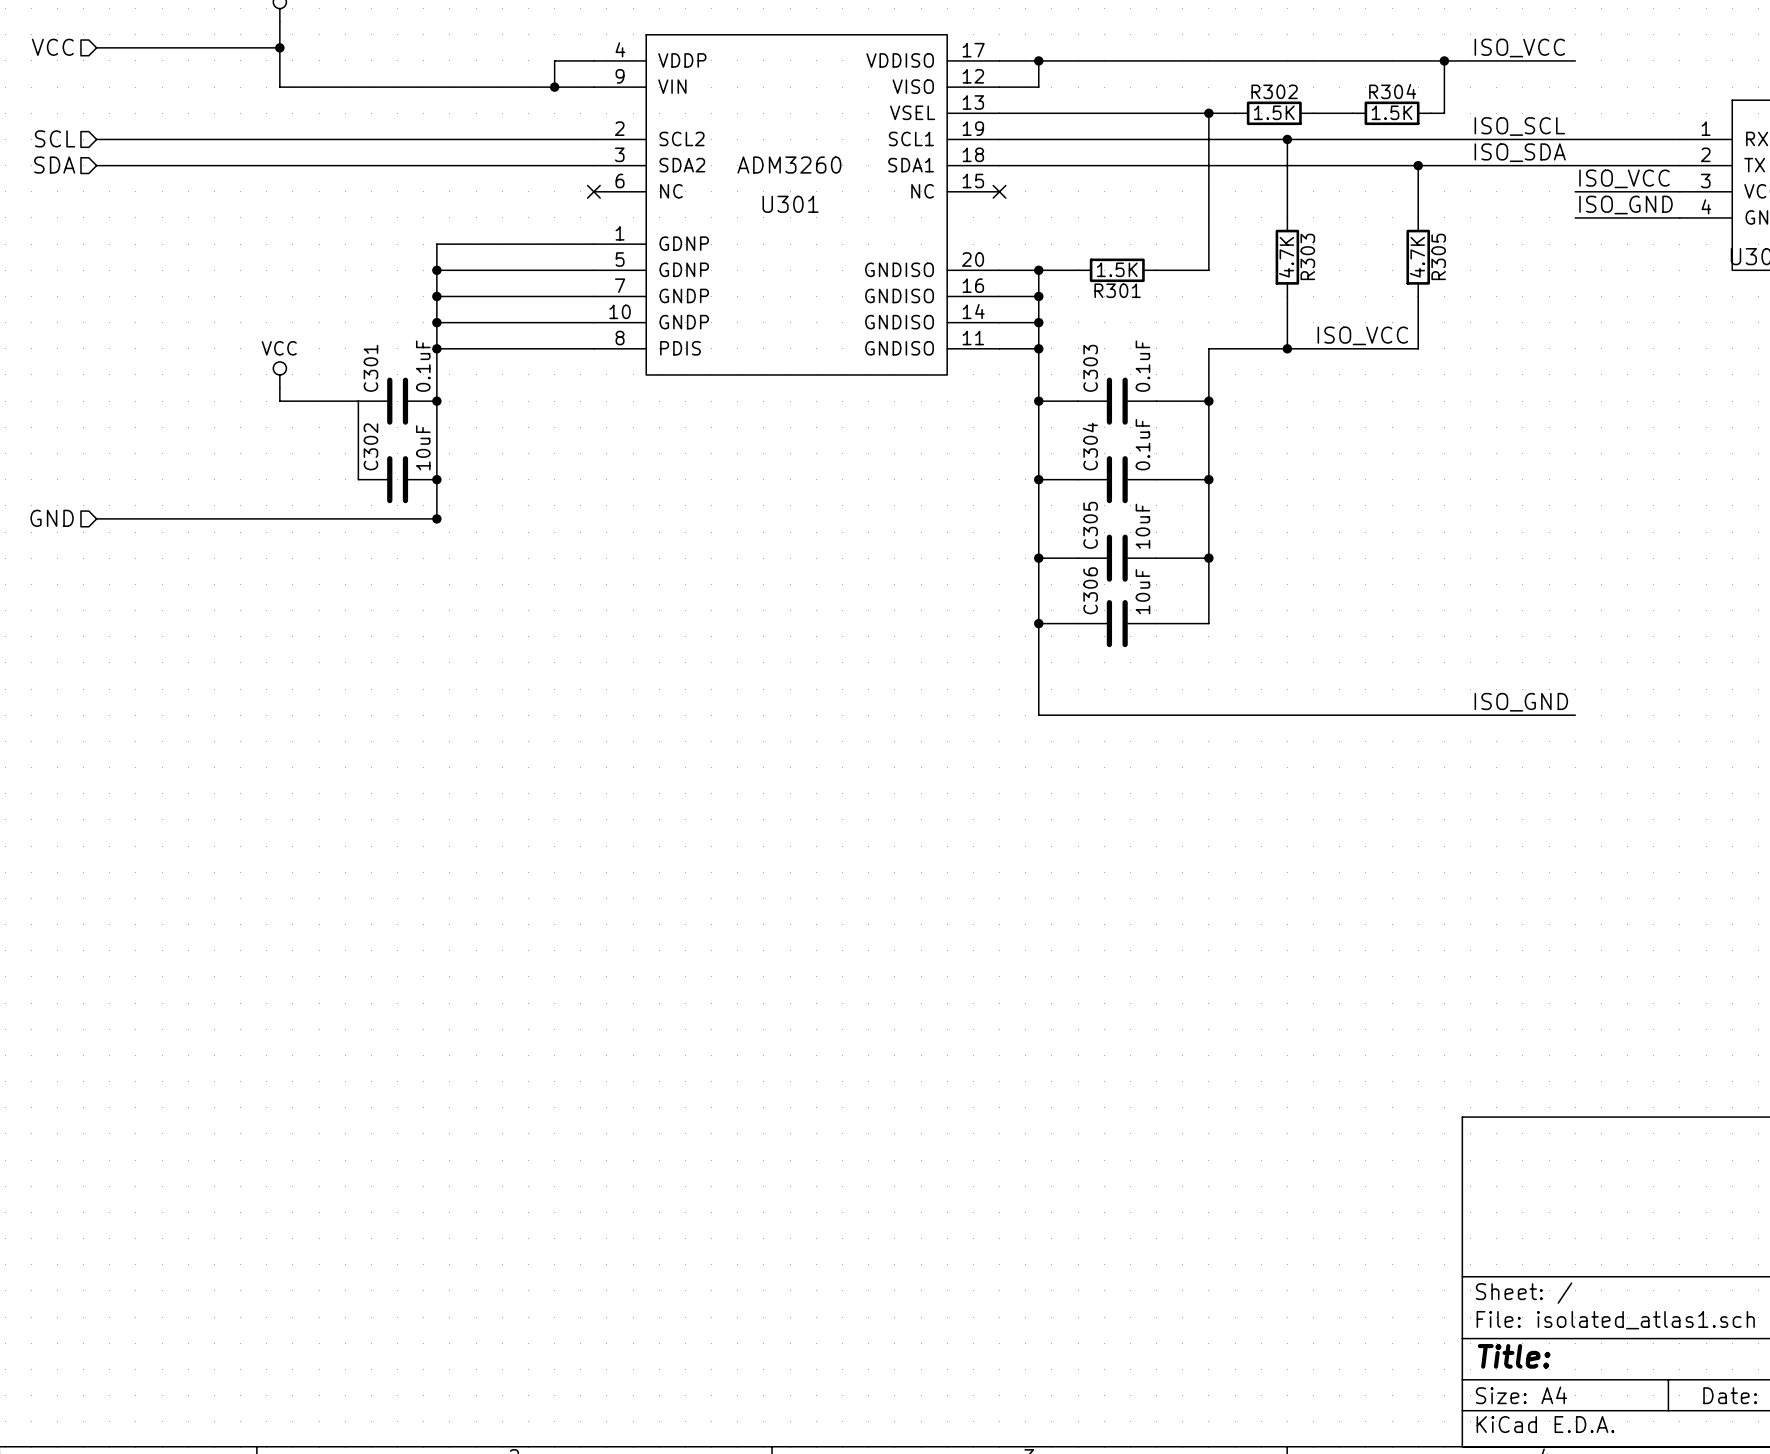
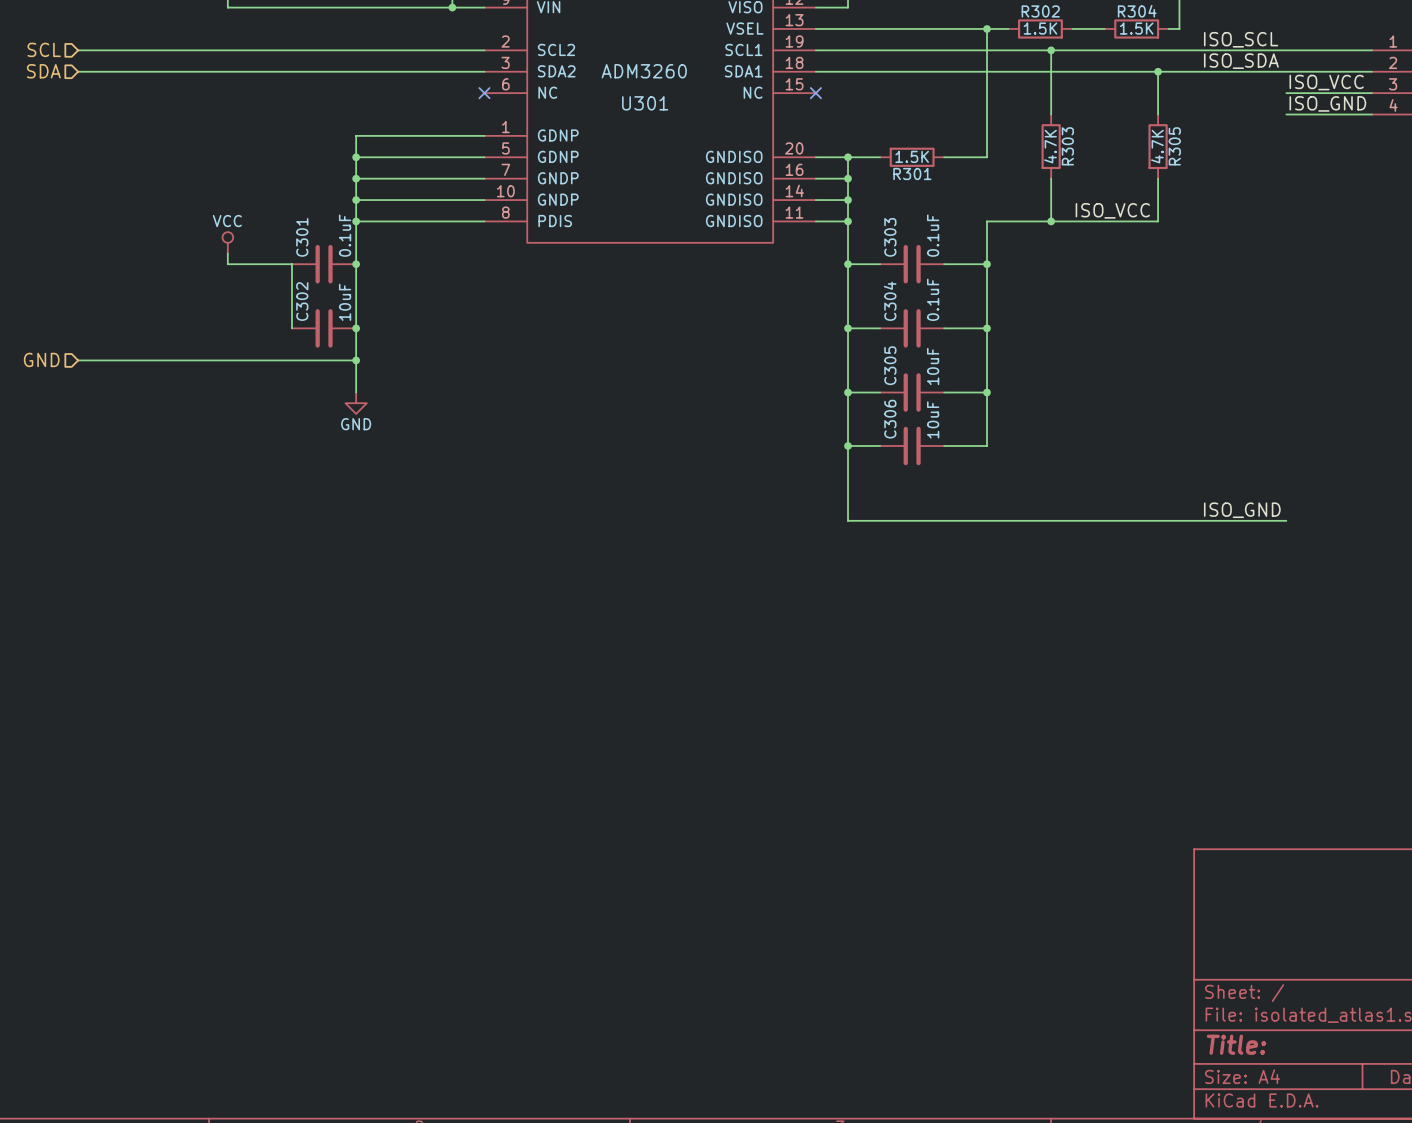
wire: none -> (356, 360) (356, 392)
power symbol: none -> GND (356, 403)

